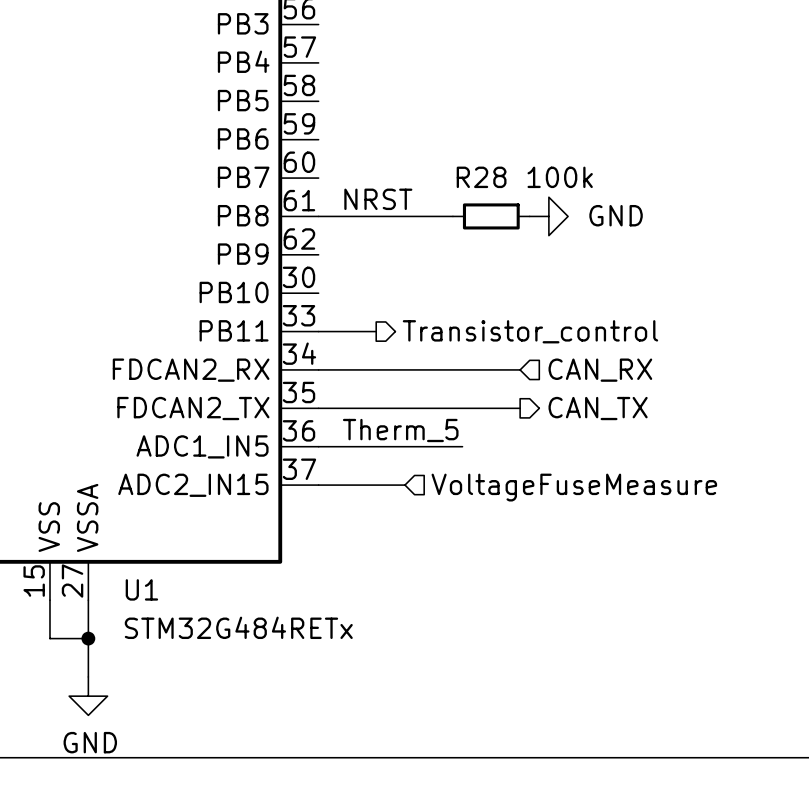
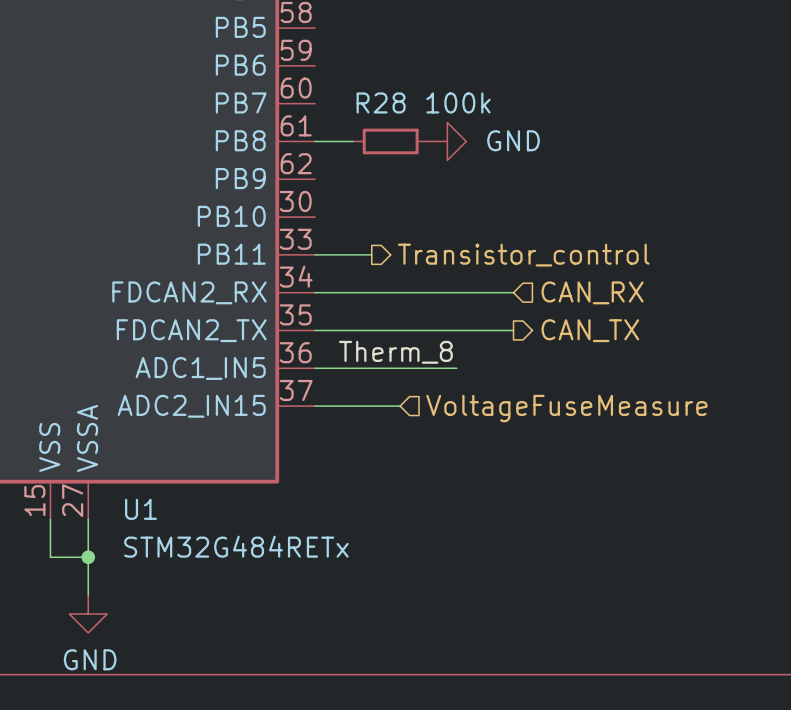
label: NRST (378, 199) -> none
wire: (357, 216) (452, 216) -> none
R28 position: (491, 216) -> (390, 141)
power symbol position: GND (548, 216) -> GND (447, 141)
label: Therm_5 (400, 430) -> Therm_8 (395, 352)

